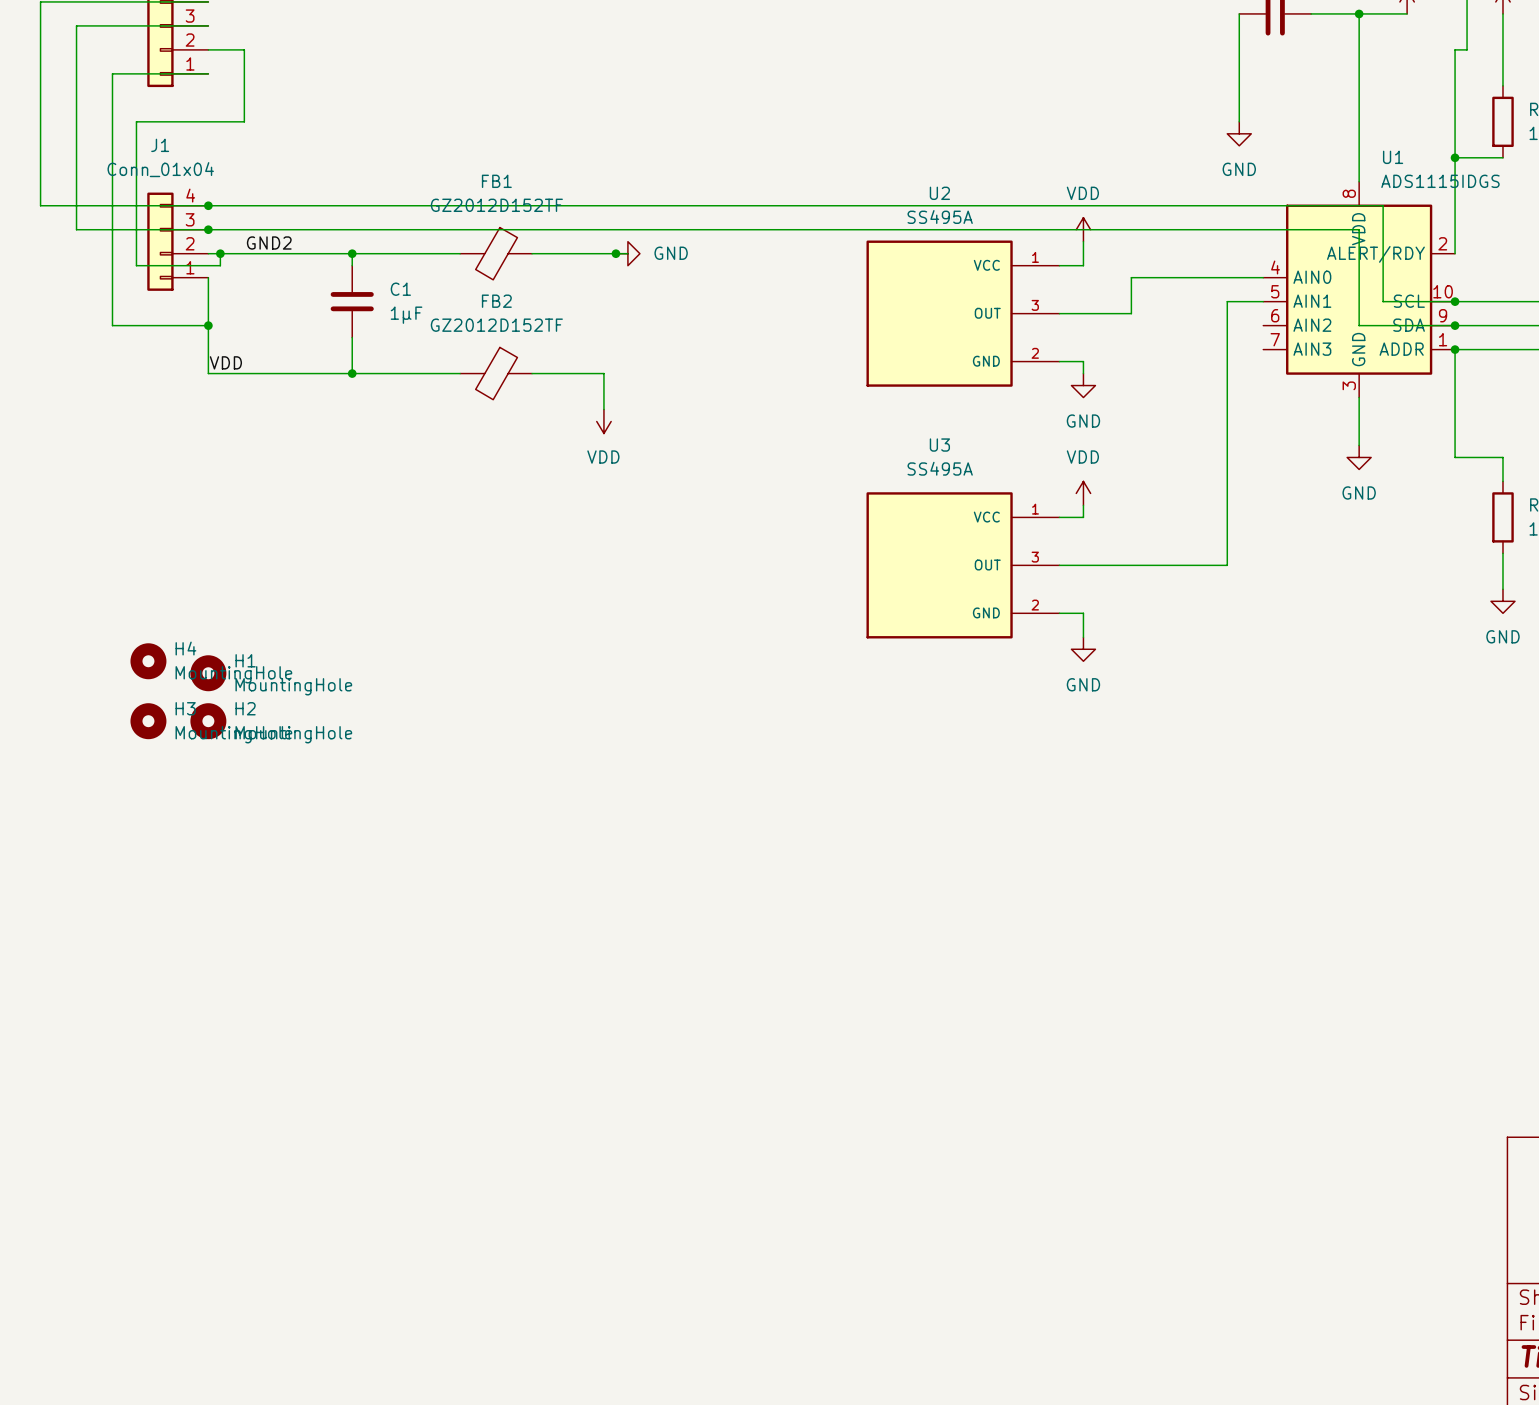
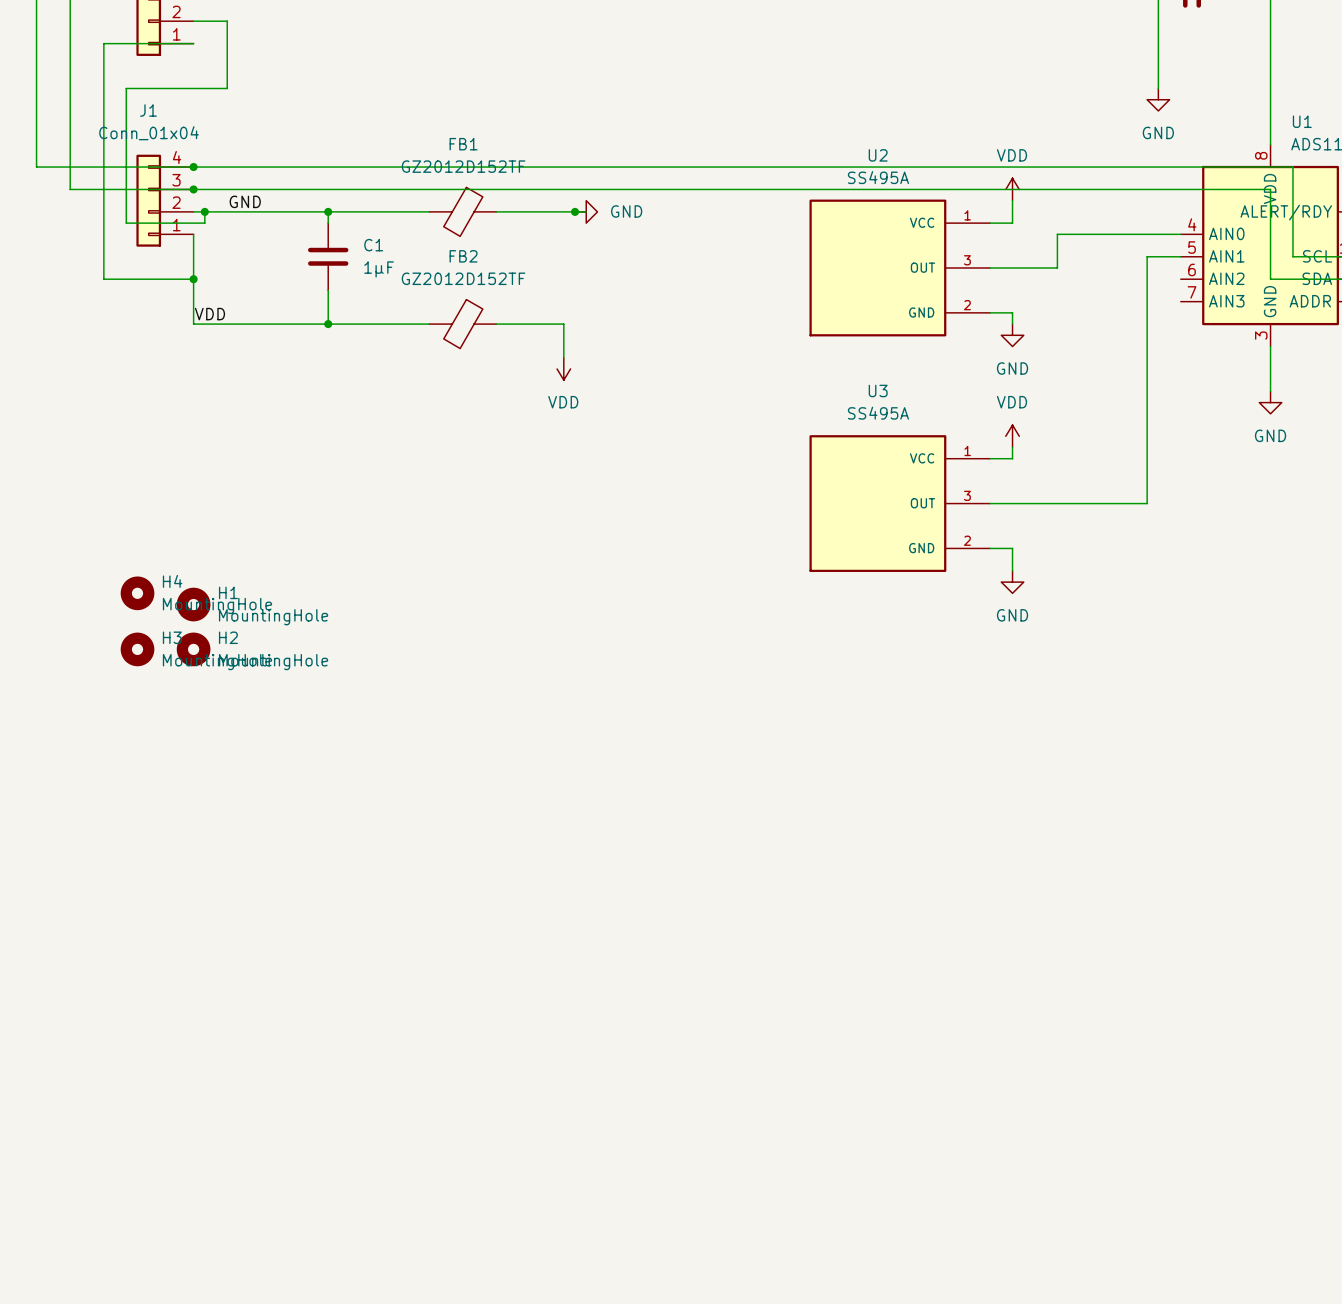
label: GND2 (269, 243) -> GND (245, 201)

